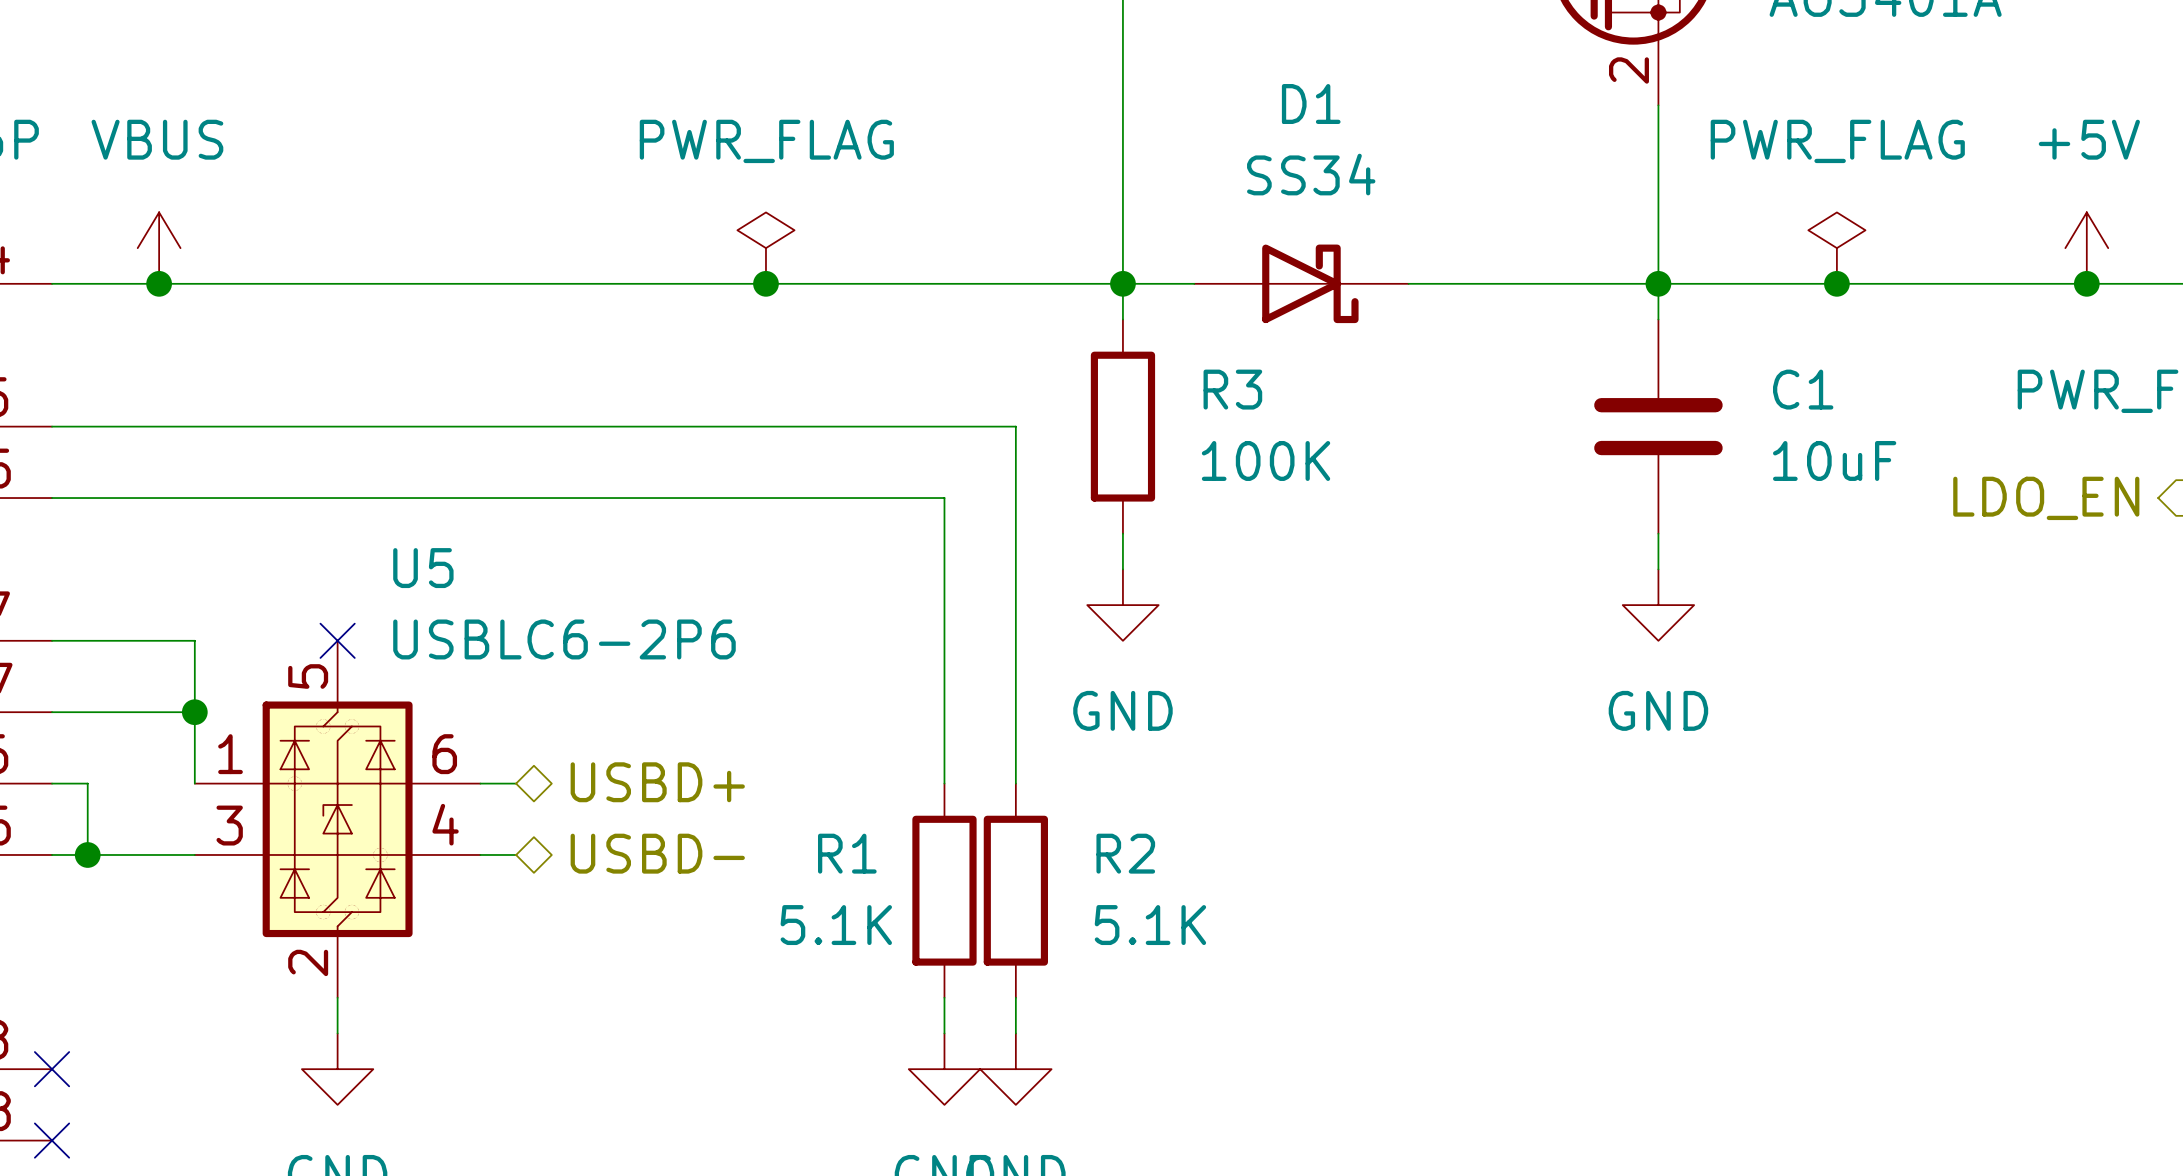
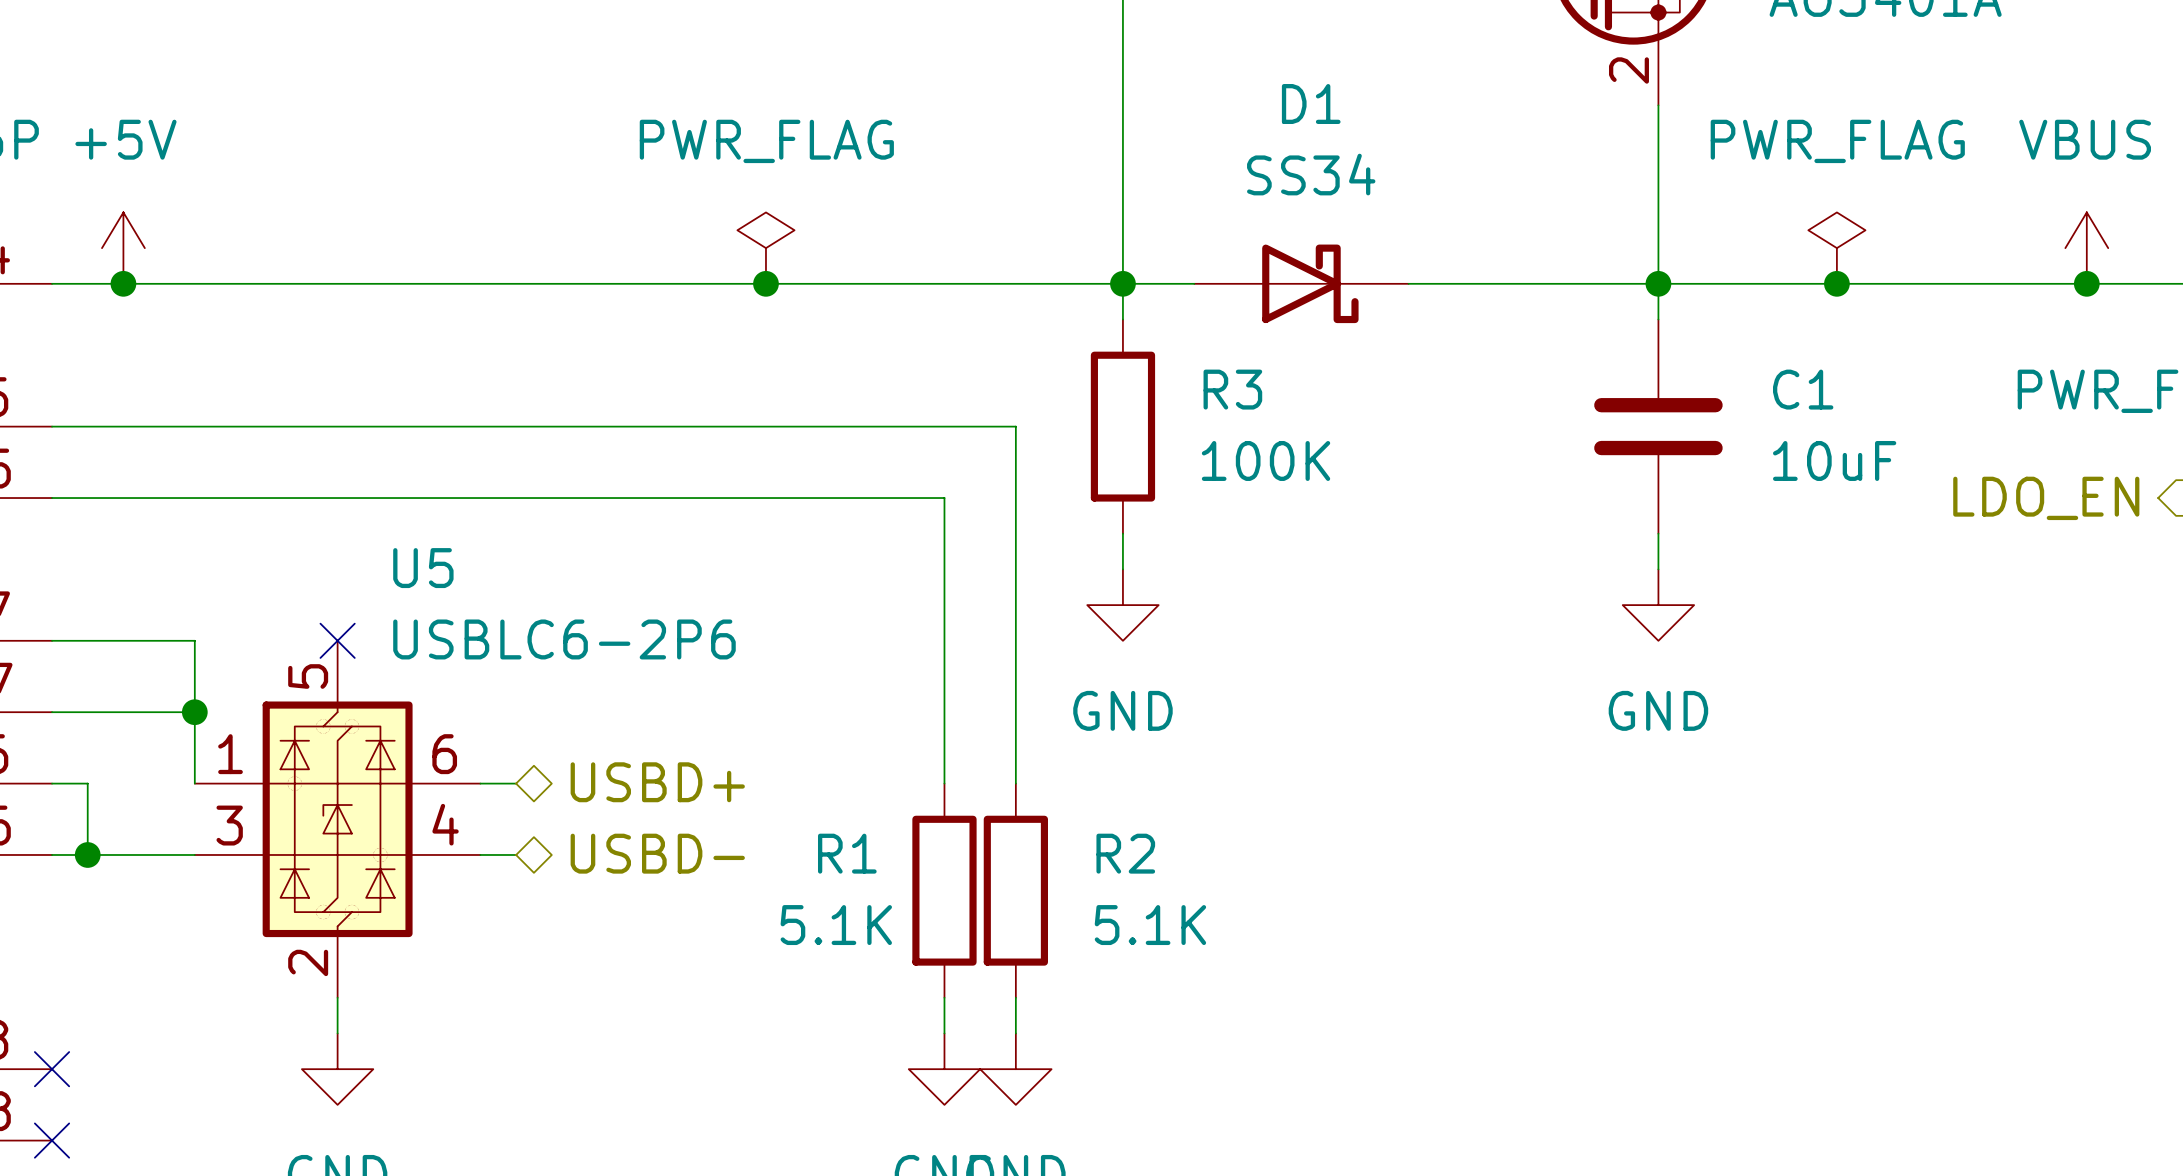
power symbol: none -> +5V (123, 248)
power symbol: VBUS (159, 248) -> none
power symbol: +5V (2086, 248) -> VBUS (2086, 248)
junction position: (159, 283) -> (123, 283)

